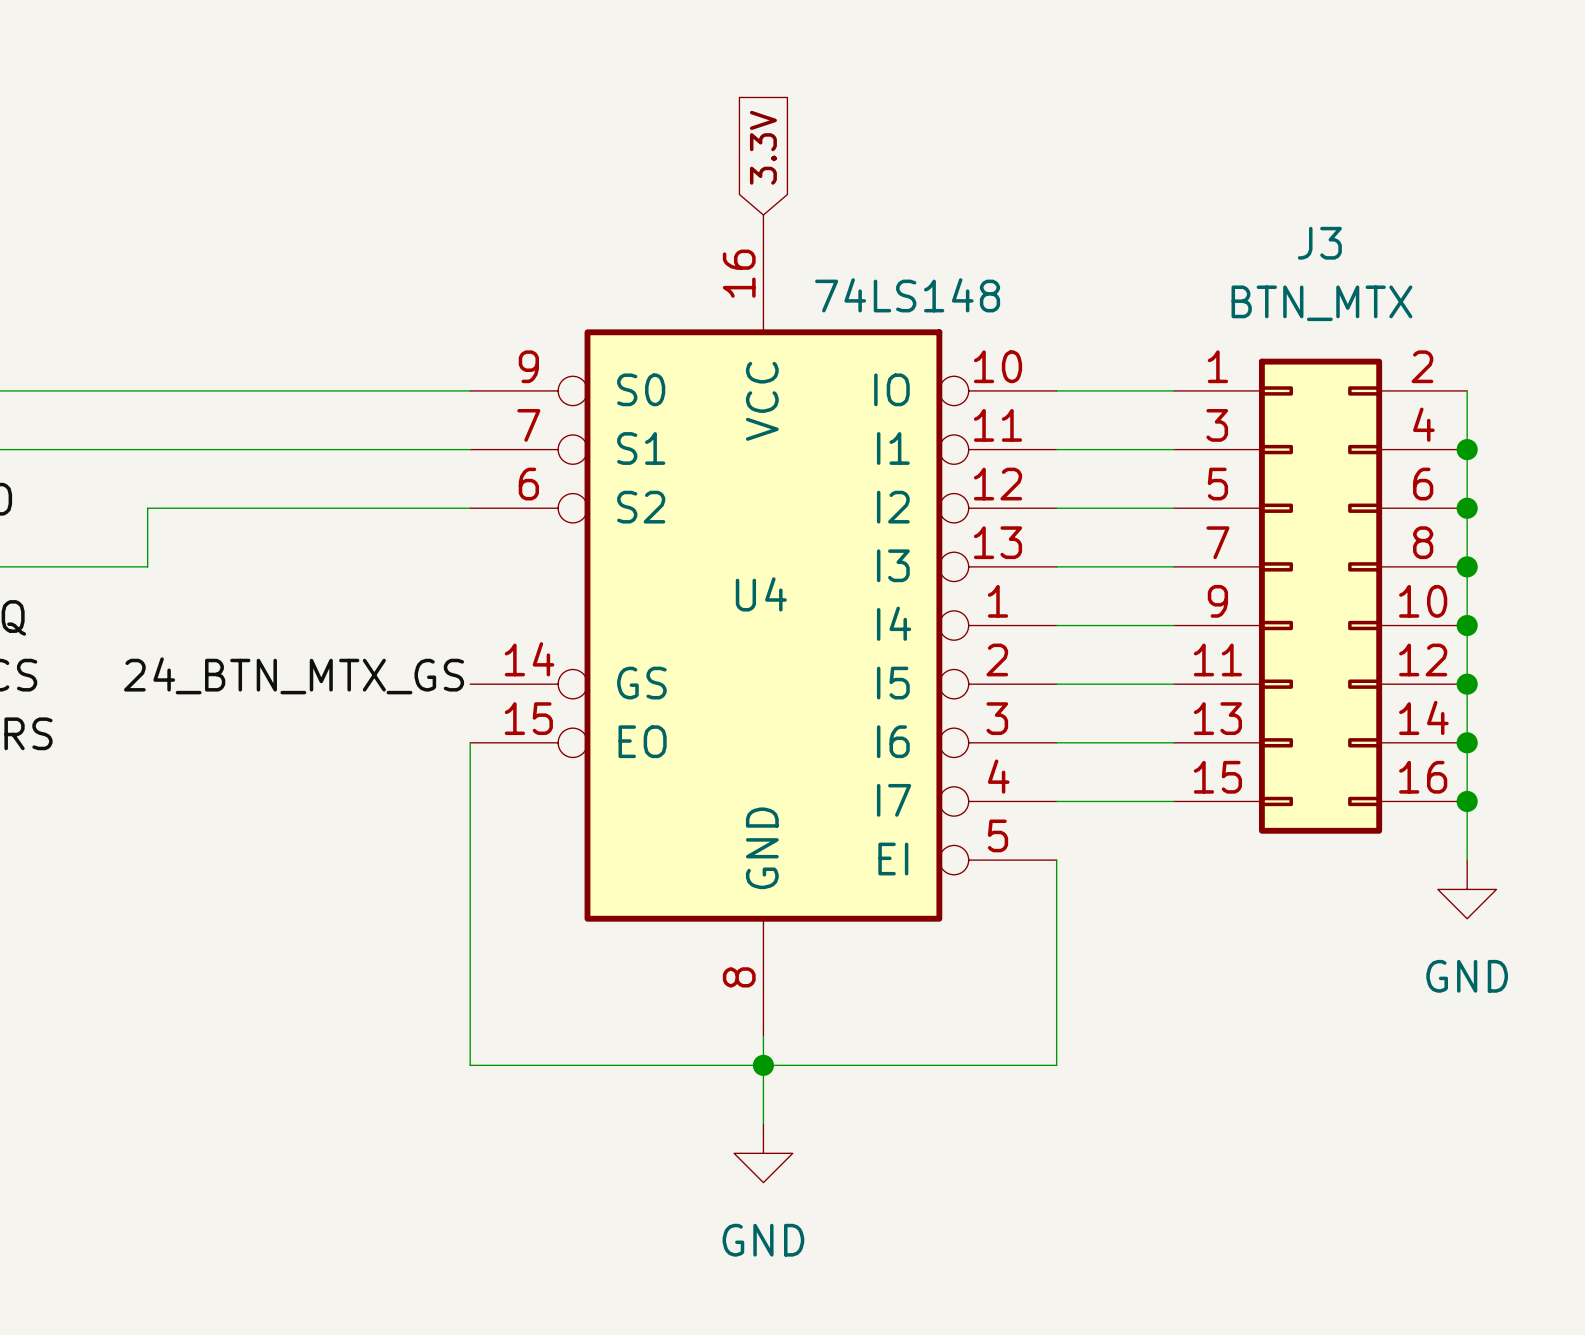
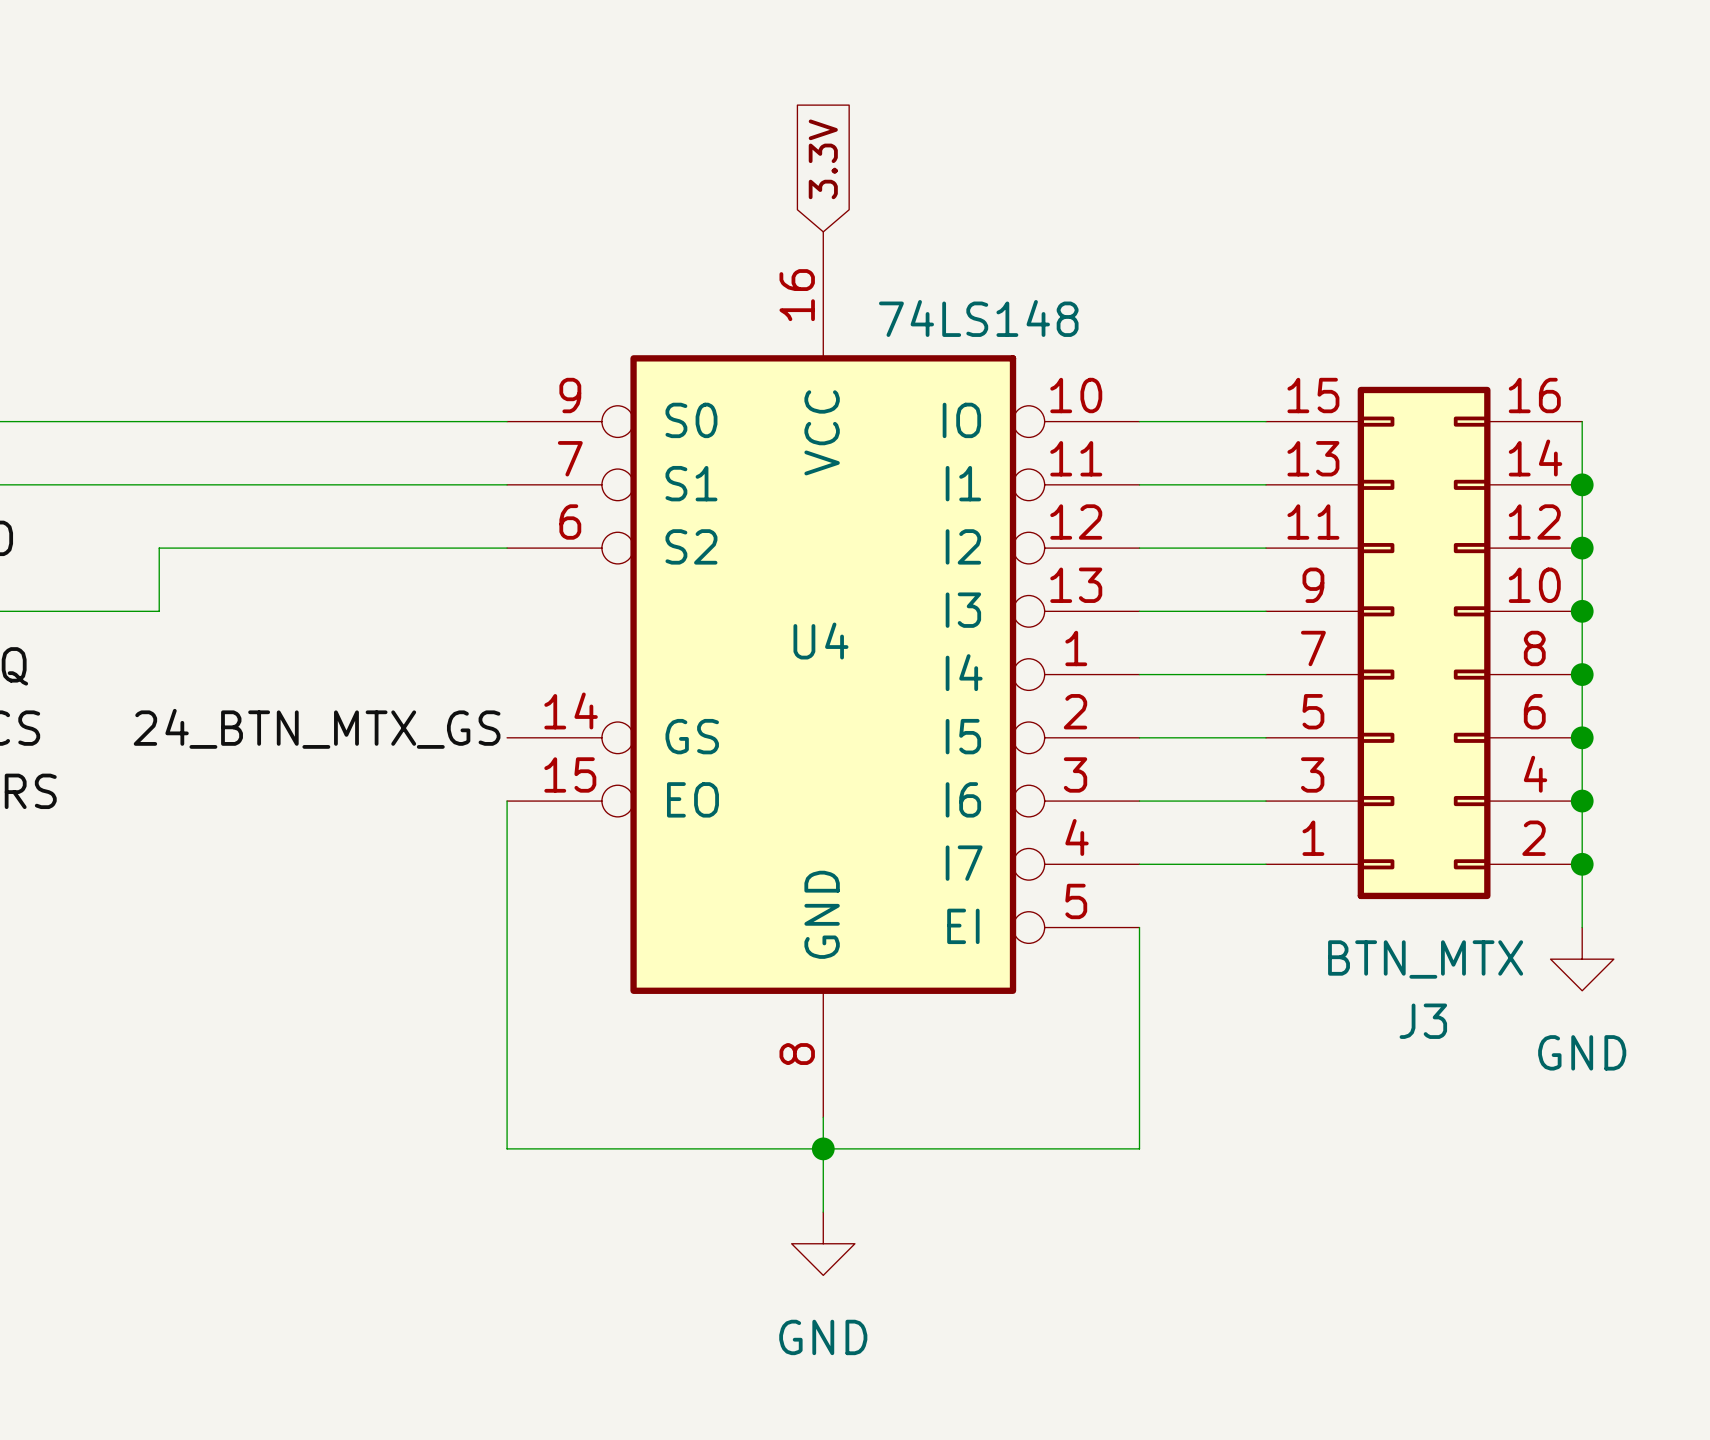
J3 flip: as is (1320, 596) -> up-down (1424, 642)

